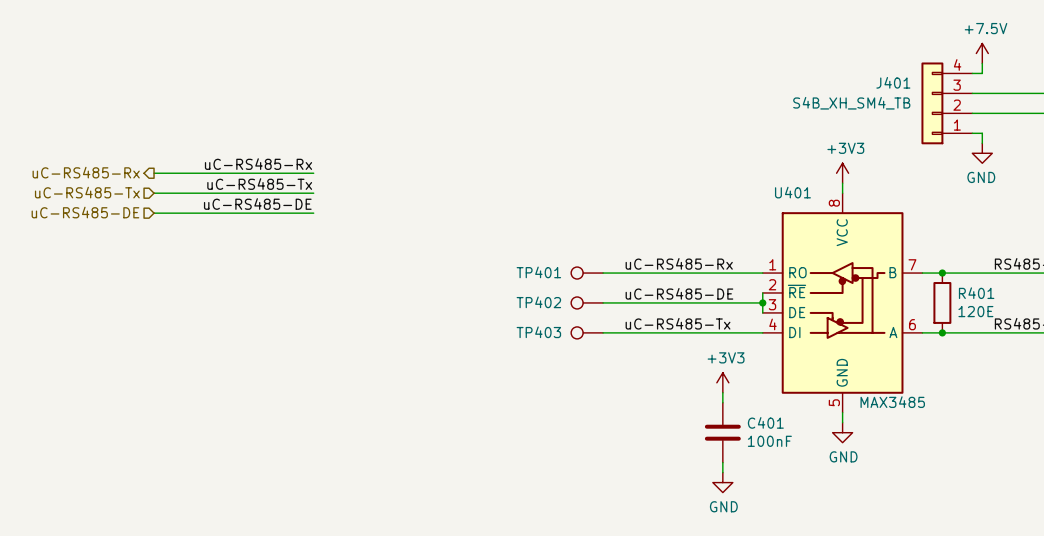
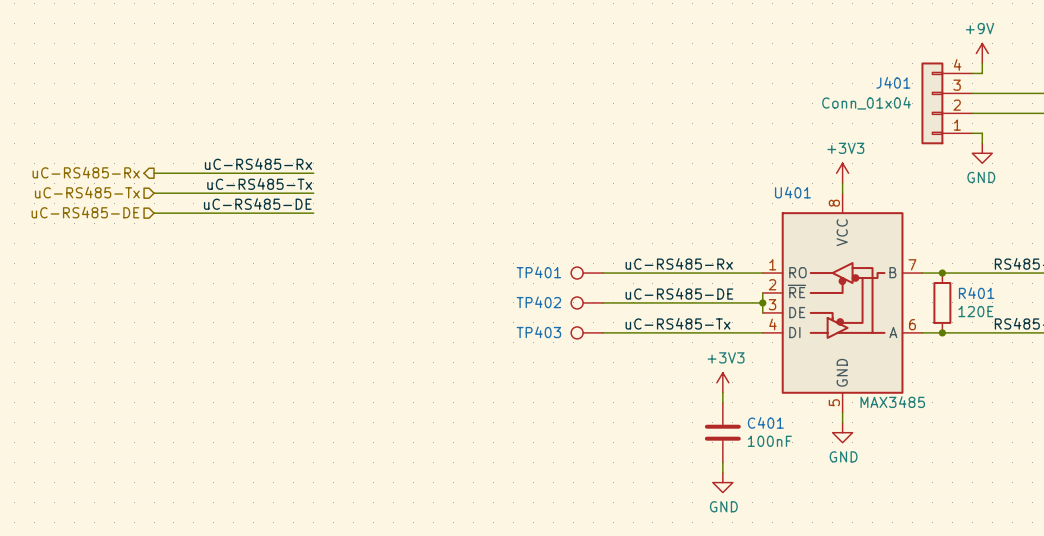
power symbol: +7.5V (982, 53) -> +9V (982, 53)
J401 value: S4B_XH_SM4_TB (851, 103) -> Conn_01x04 (866, 103)

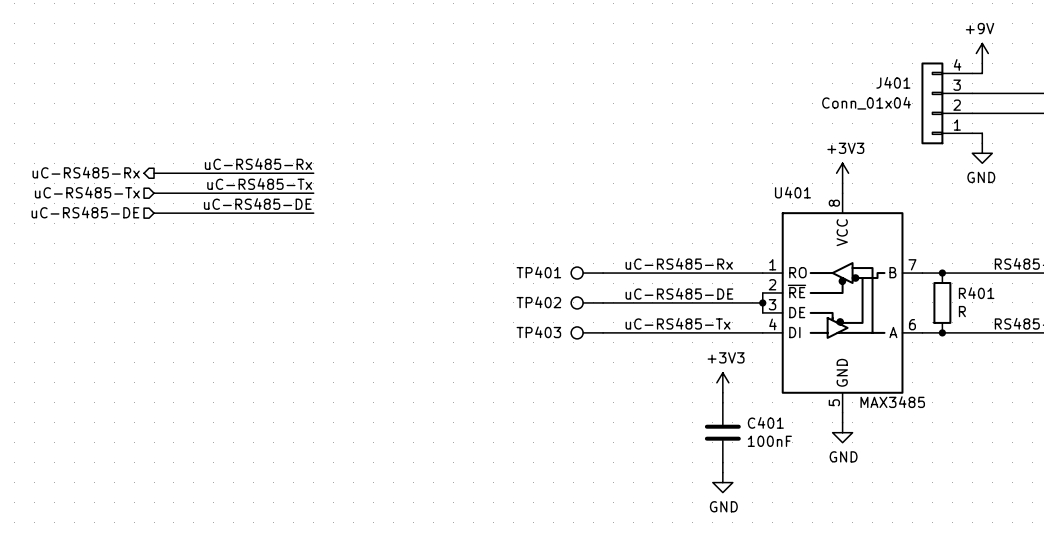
R401 value: 120E (975, 311) -> R (962, 311)

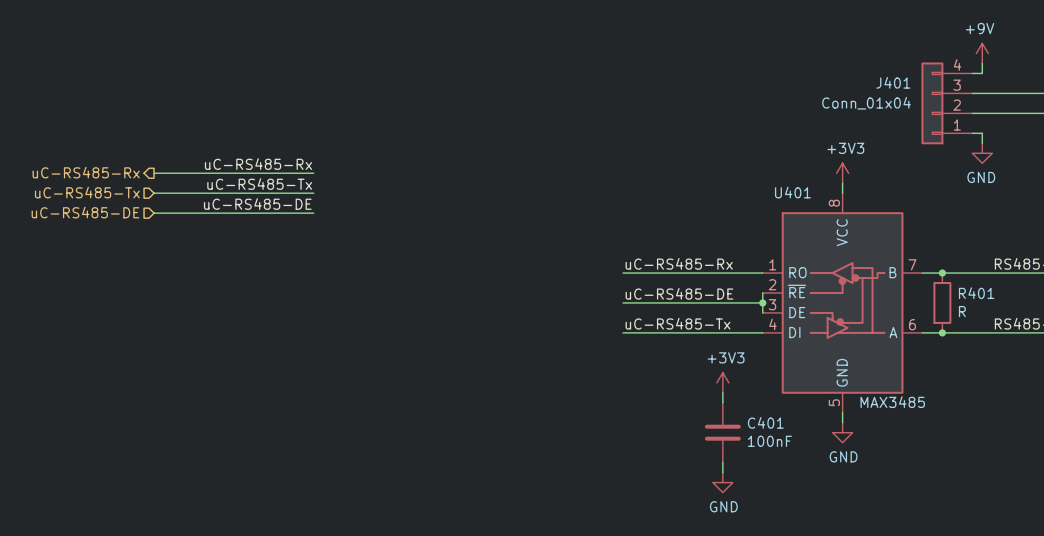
TP401: (587, 273) -> none
wire: (603, 273) (623, 273) -> none
TP402: (587, 302) -> none
wire: (603, 302) (623, 302) -> none
TP403: (587, 332) -> none
wire: (603, 332) (623, 332) -> none

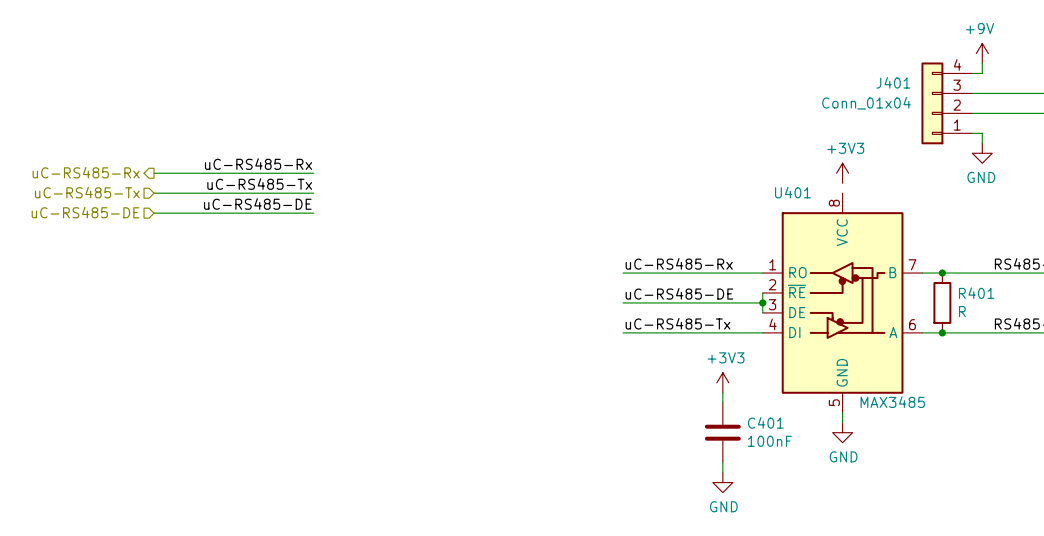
wire: (842, 183) (842, 193) -> none

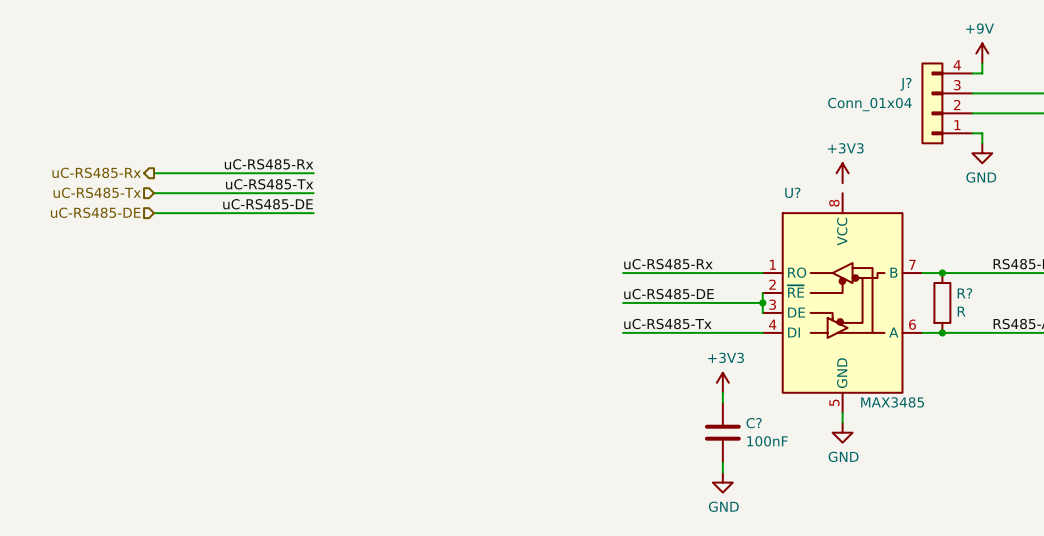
J401 name: J401 (893, 82) -> J? (905, 84)
U401 name: U401 (792, 192) -> U? (792, 192)
R401 name: R401 (976, 293) -> R? (964, 293)
C401 name: C401 (765, 422) -> C? (754, 423)

